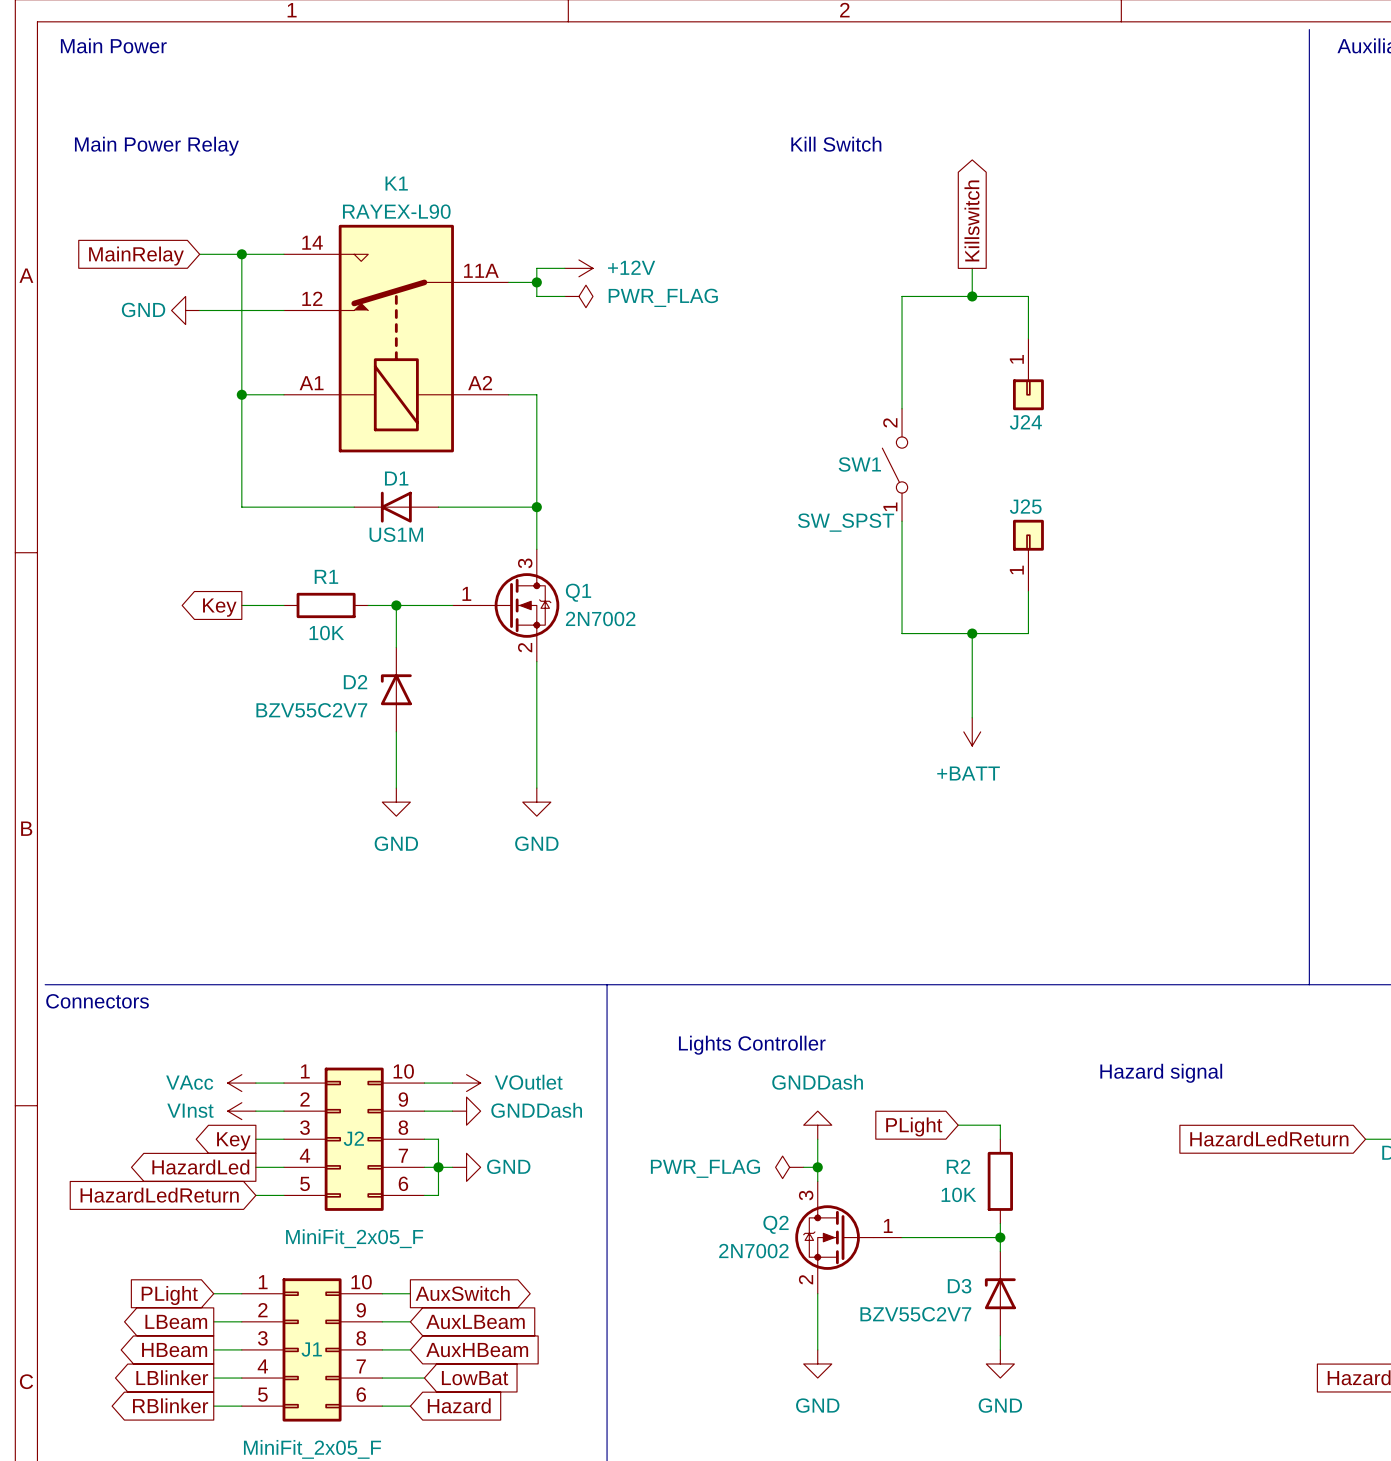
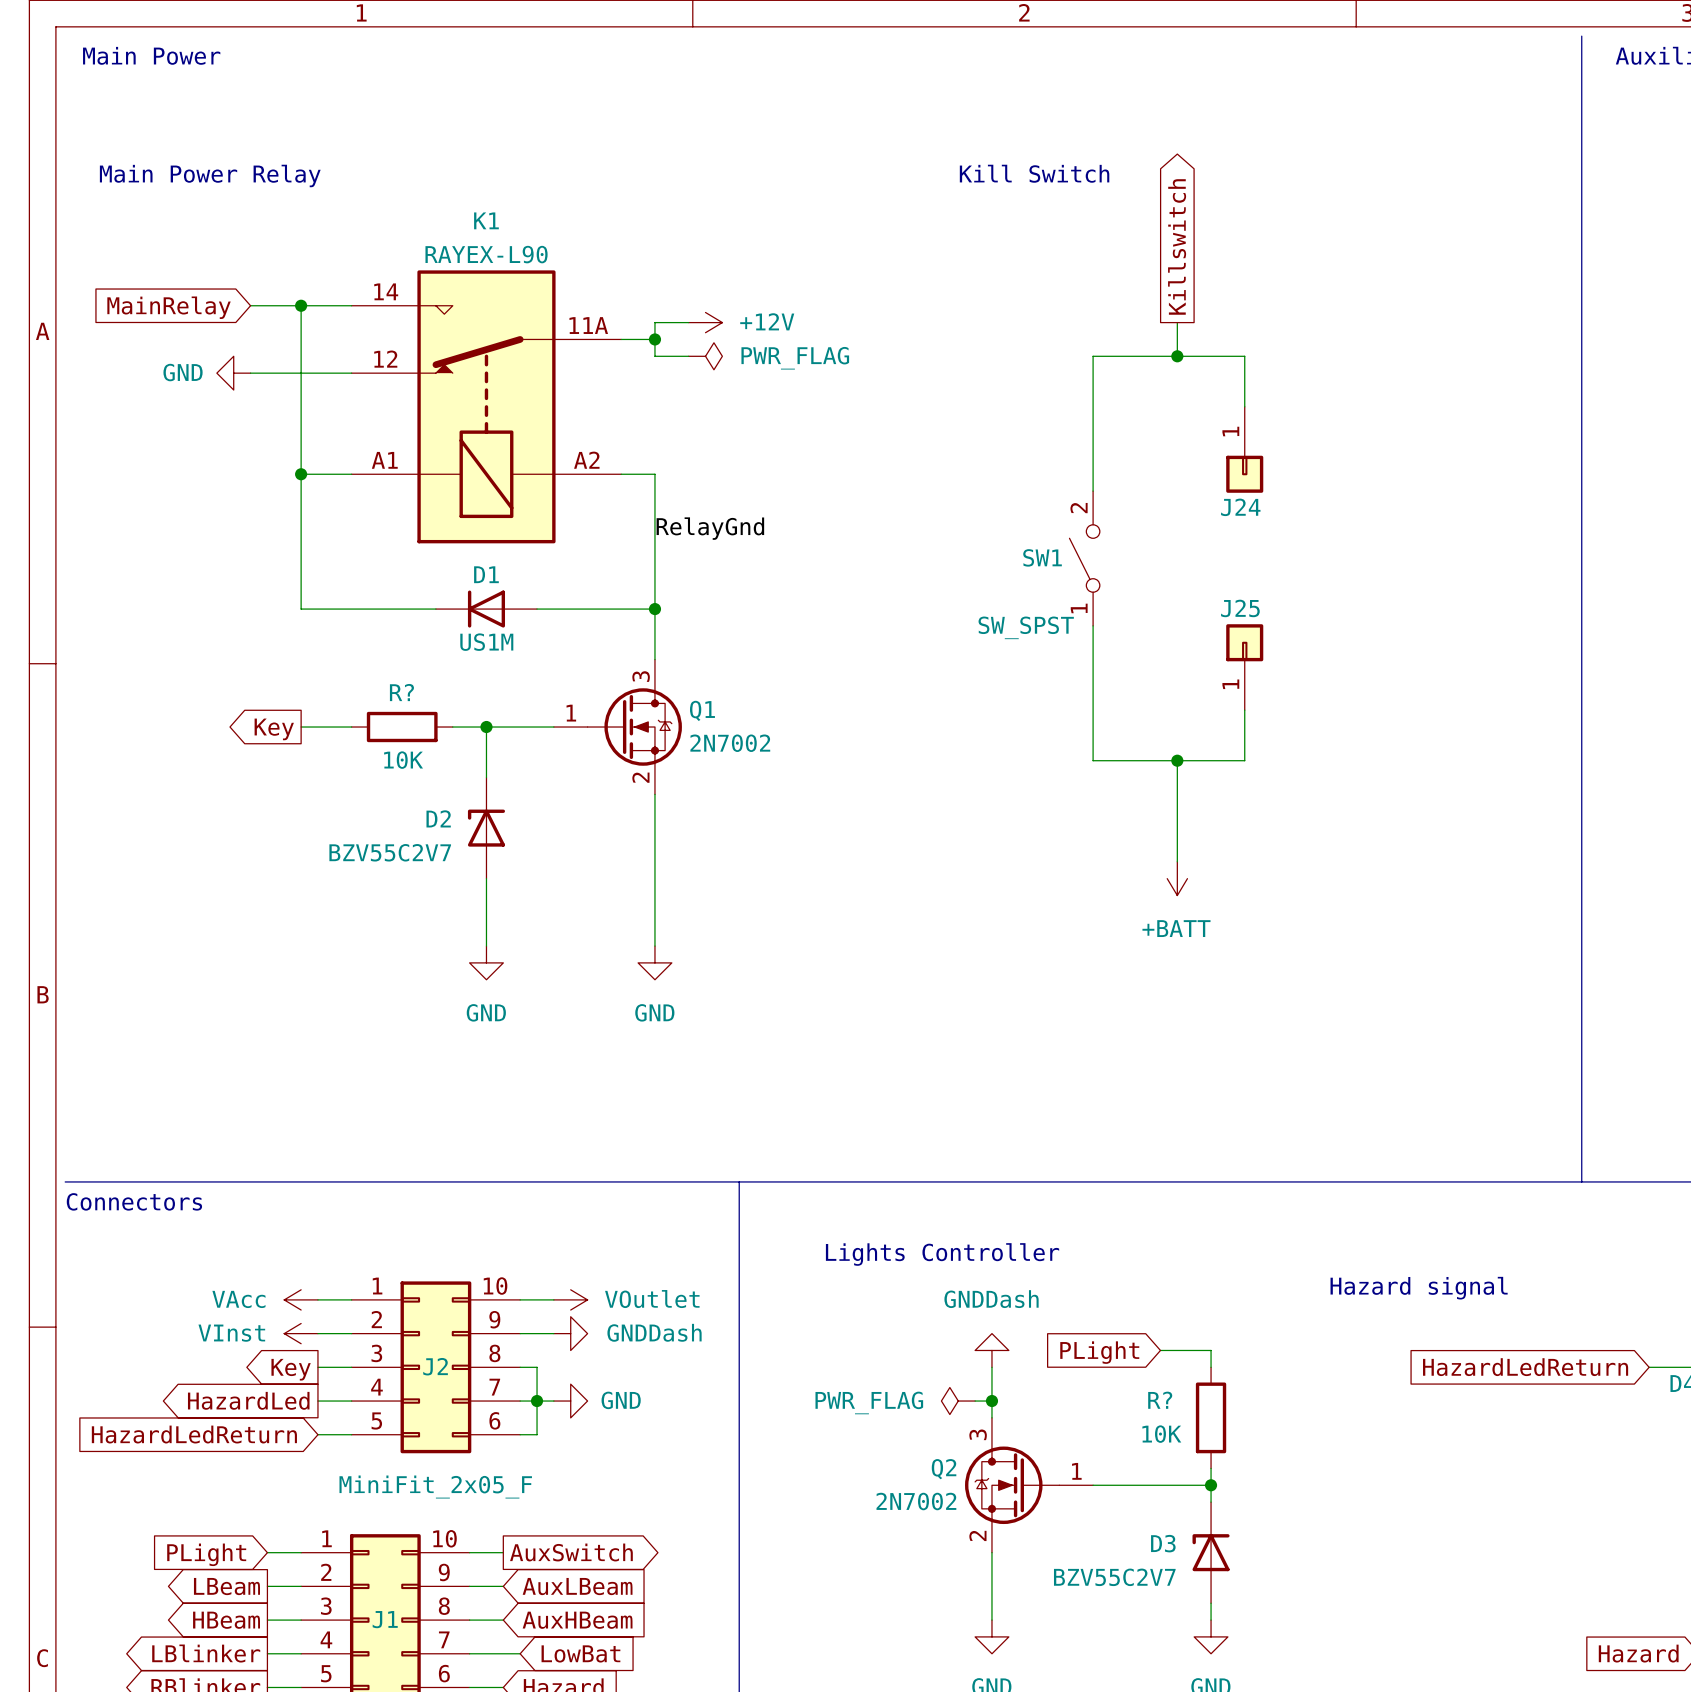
label: none -> RelayGnd (710, 528)
R1 name: R1 (326, 576) -> R? (401, 692)
R2 name: R2 (958, 1166) -> R? (1160, 1400)

